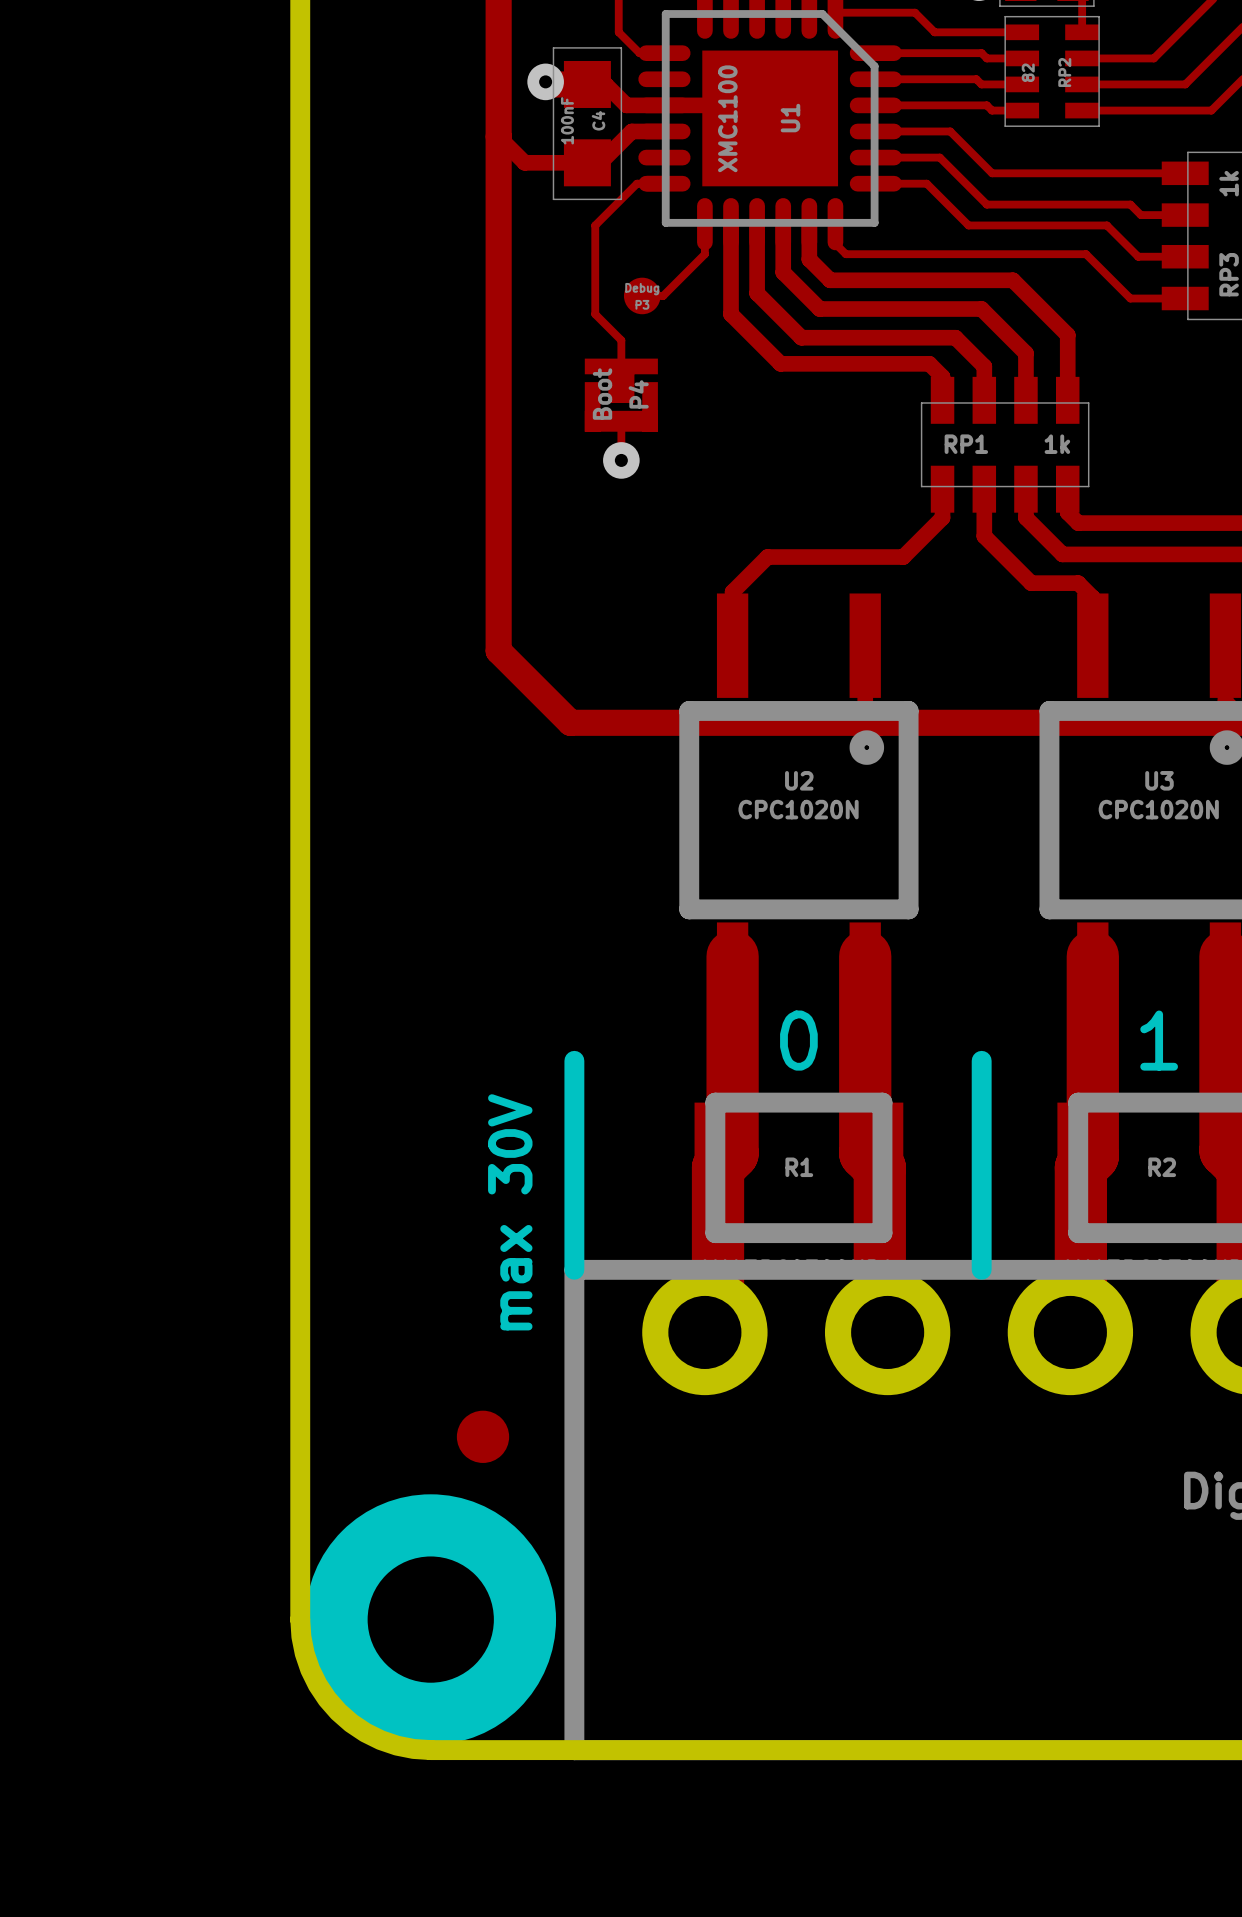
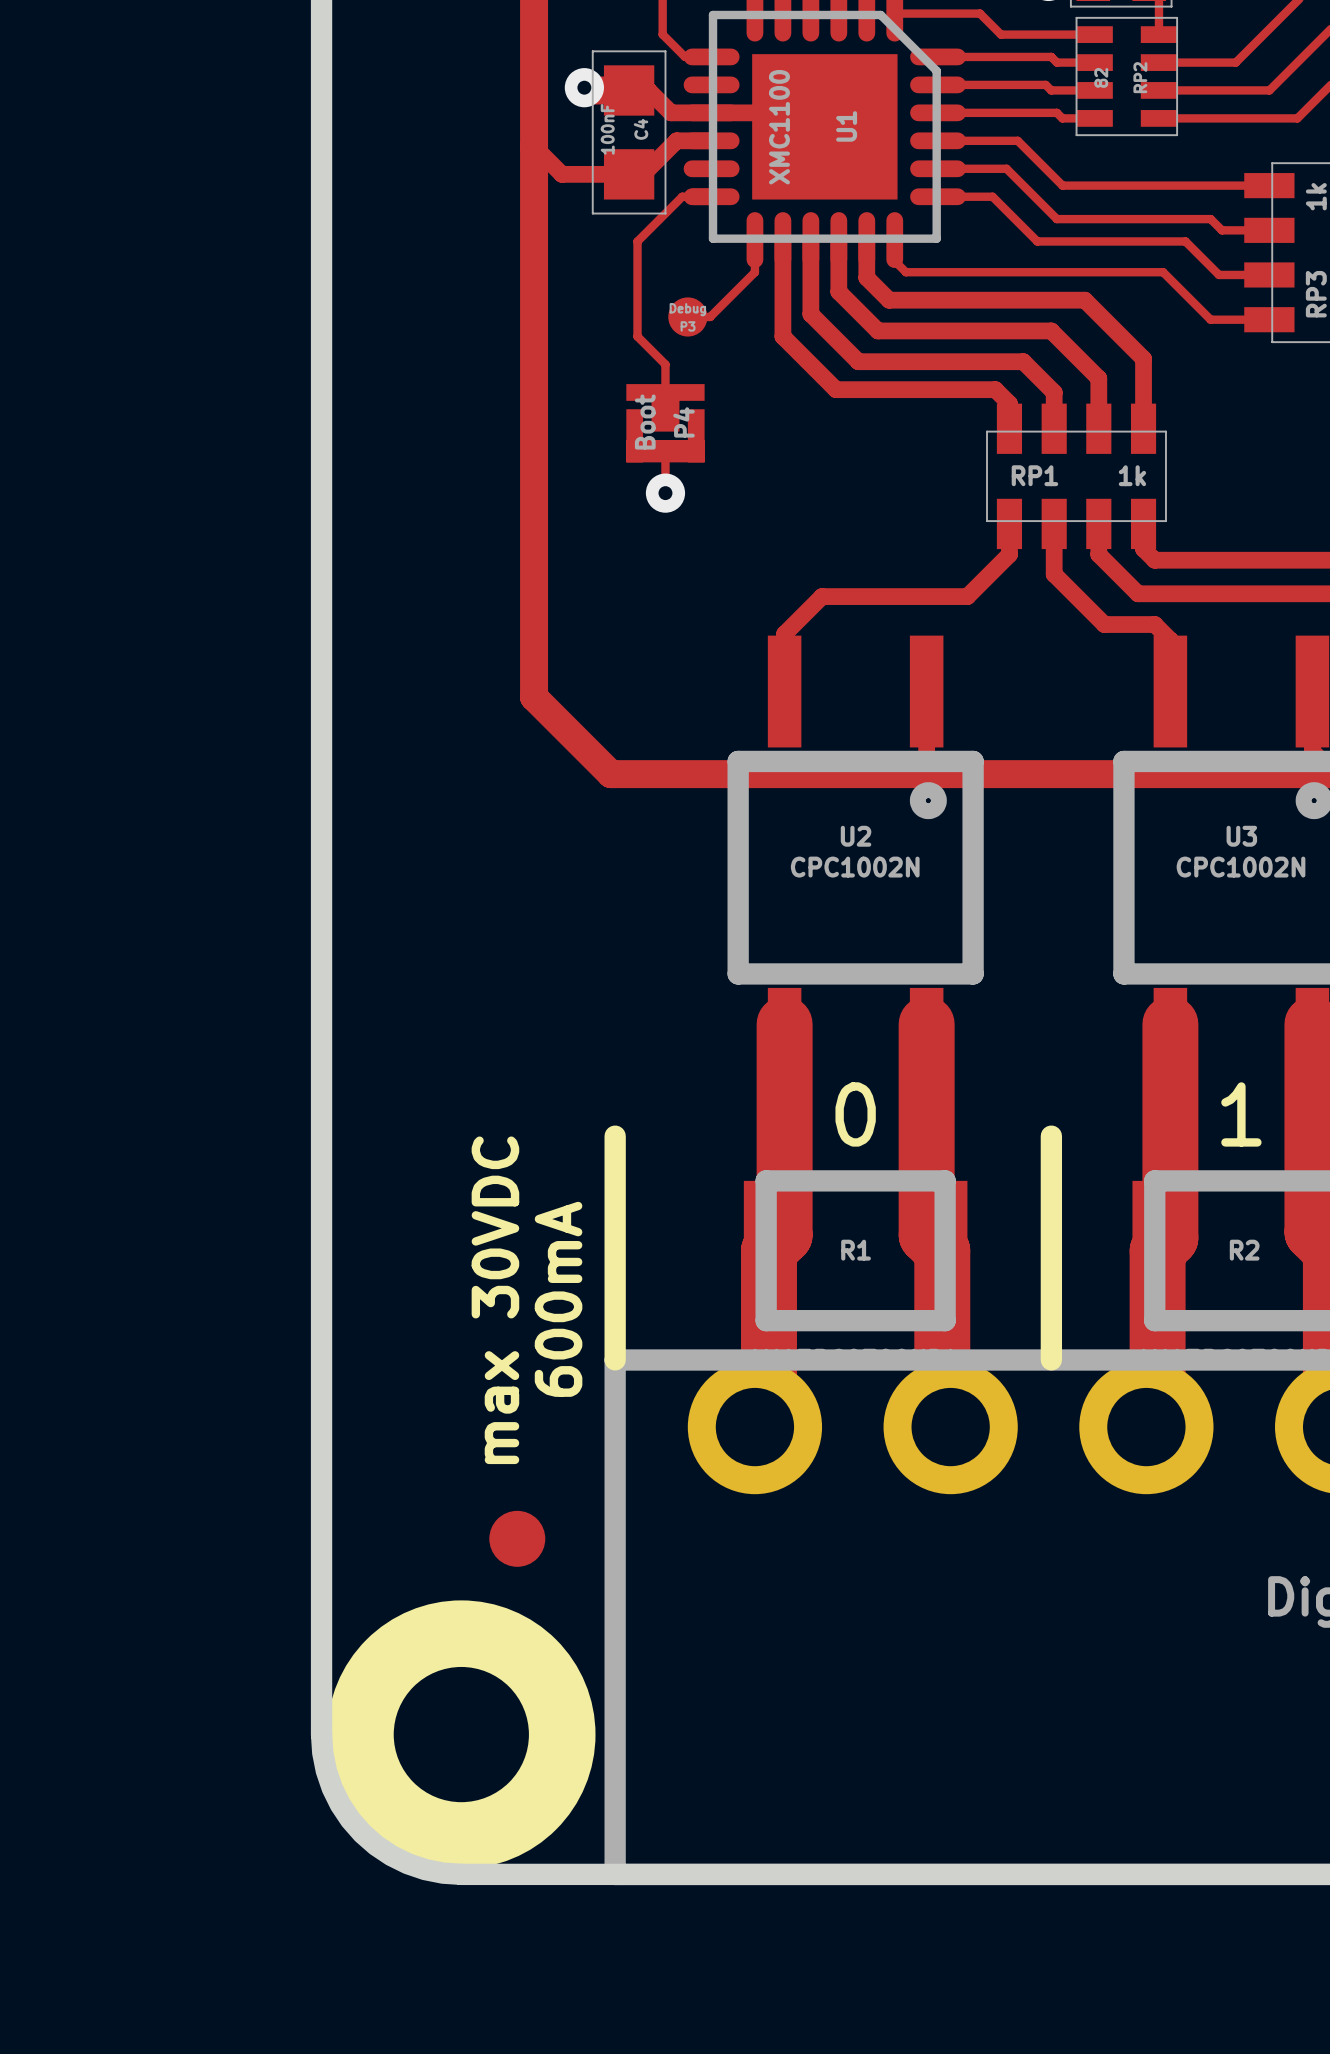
U2 value: CPC1020N (798, 809) -> CPC1002N (855, 867)
U3 value: CPC1020N (1158, 809) -> CPC1002N (1241, 867)
text: max 30V (510, 1212) -> 600mA (558, 1299)
text: none -> max 30VDC (495, 1300)

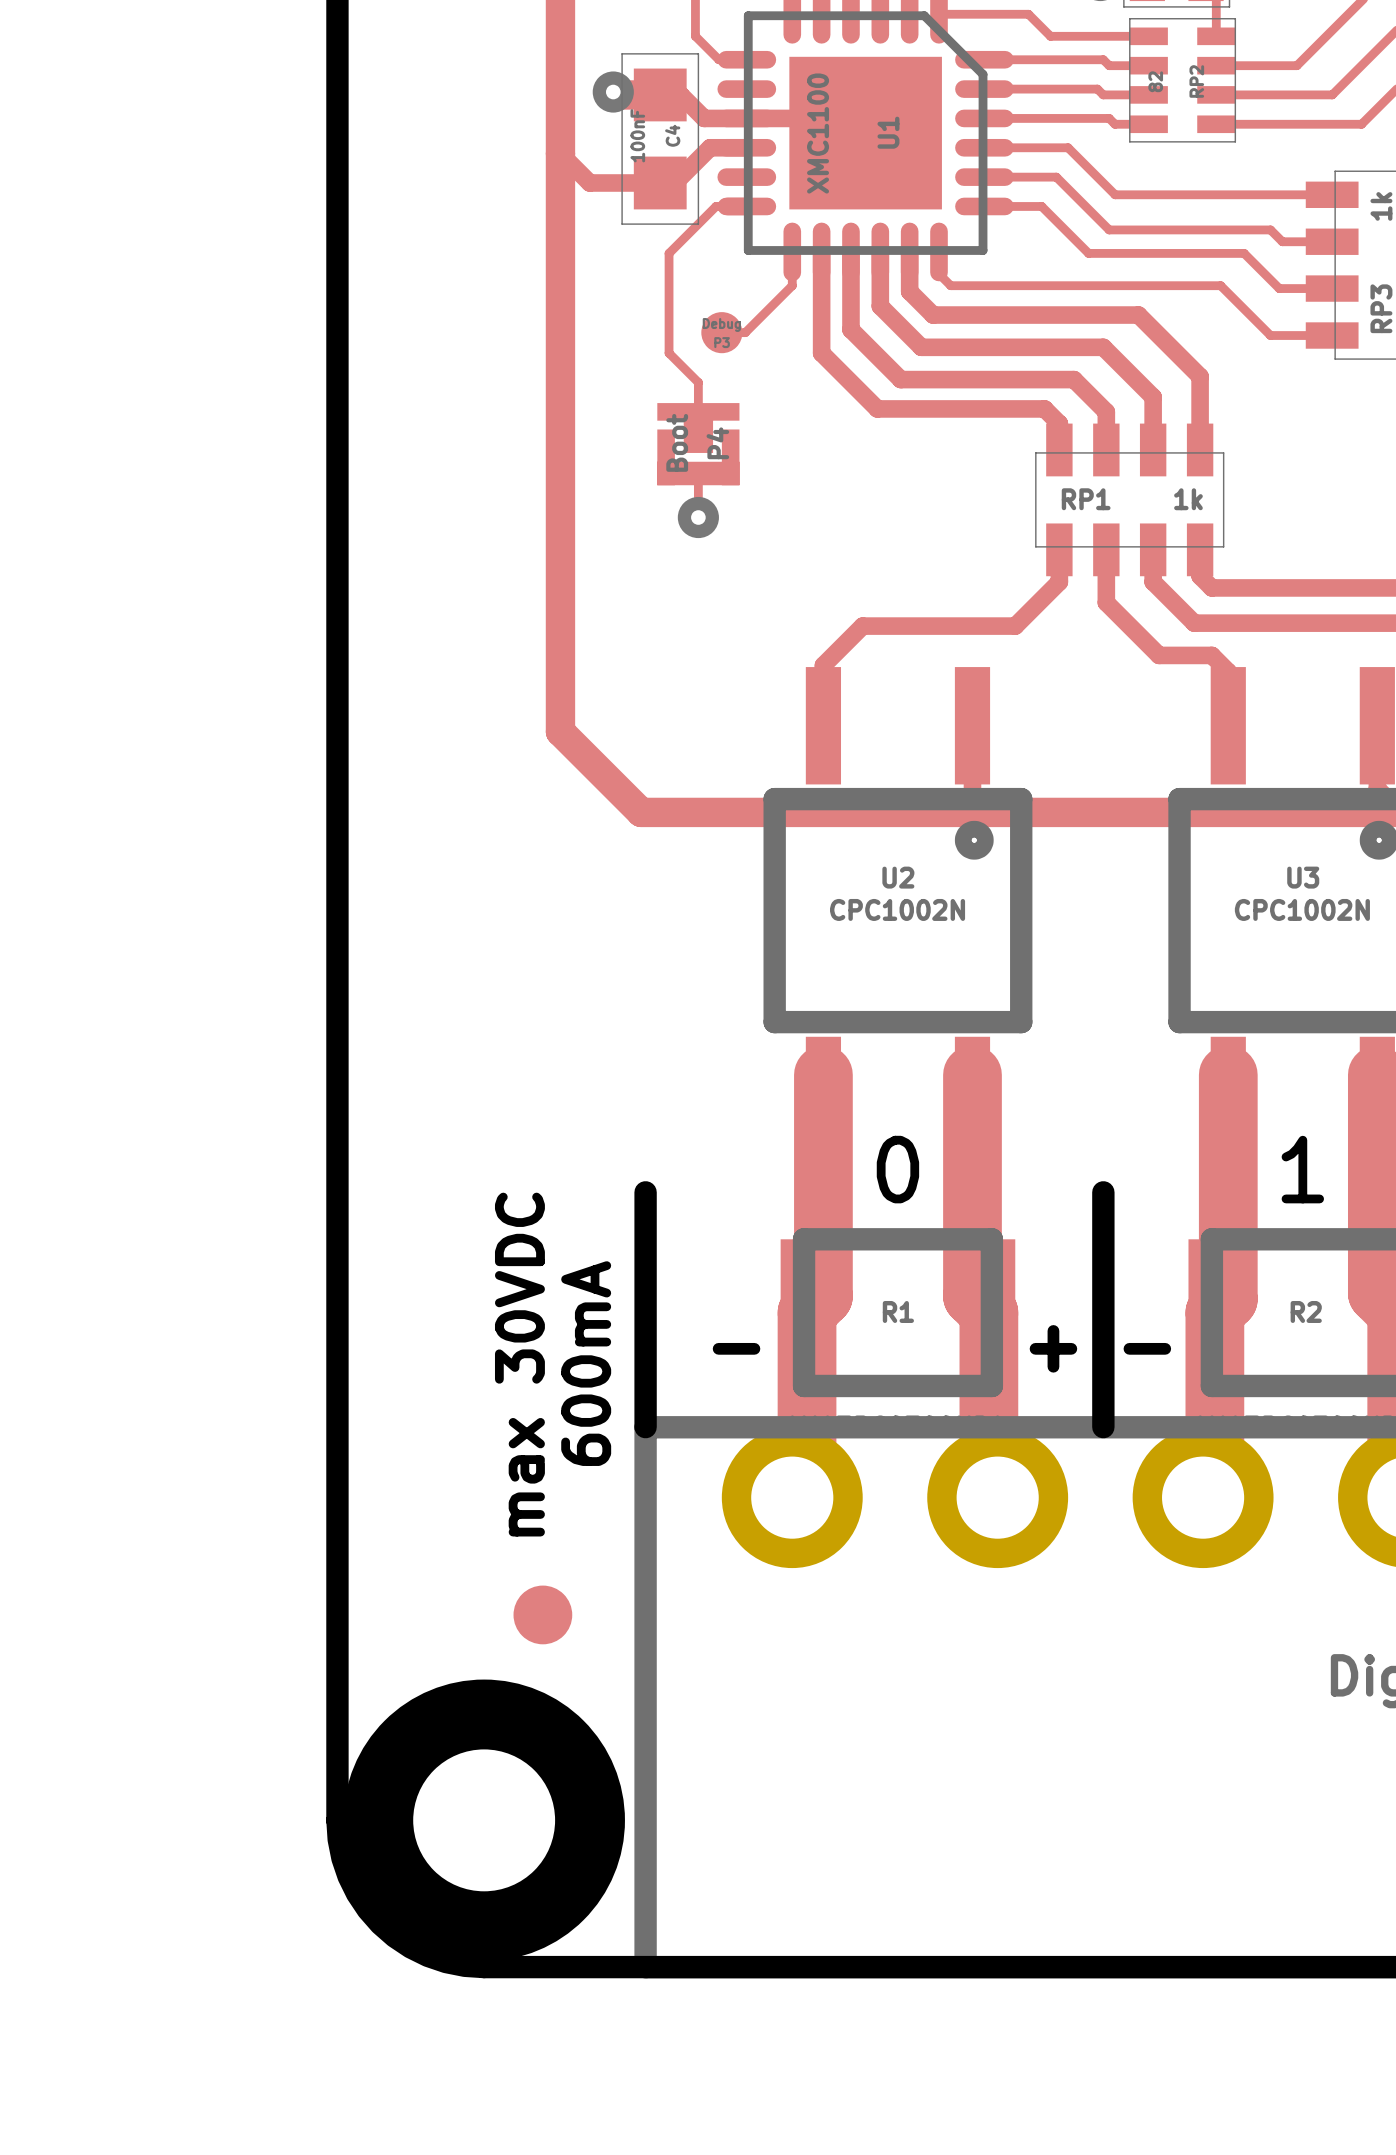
text: none -> - (736, 1348)
text: none -> + (1053, 1348)
text: none -> - (1147, 1348)

